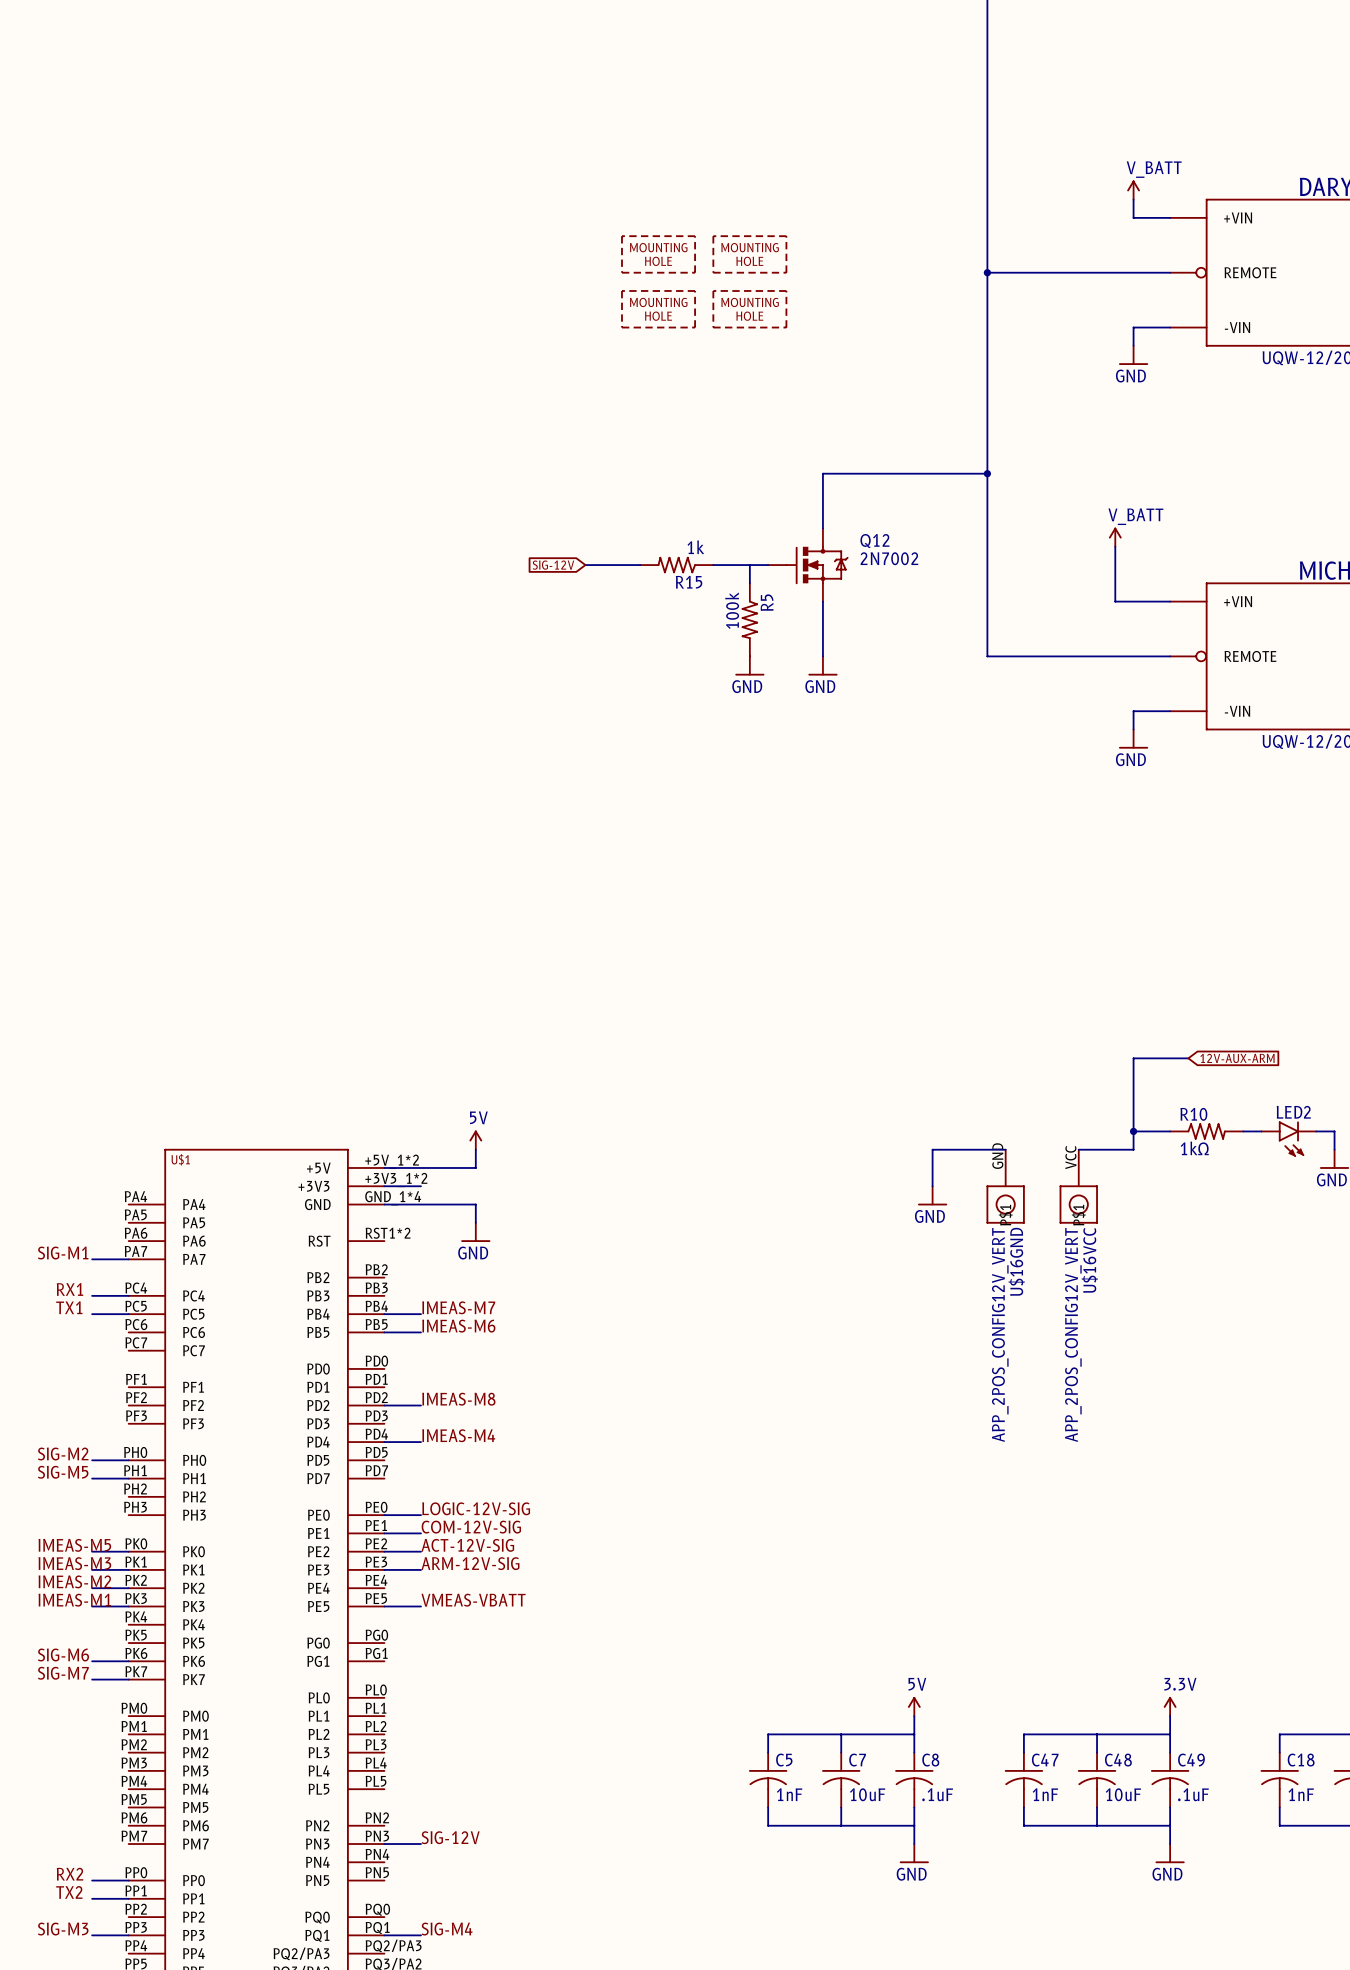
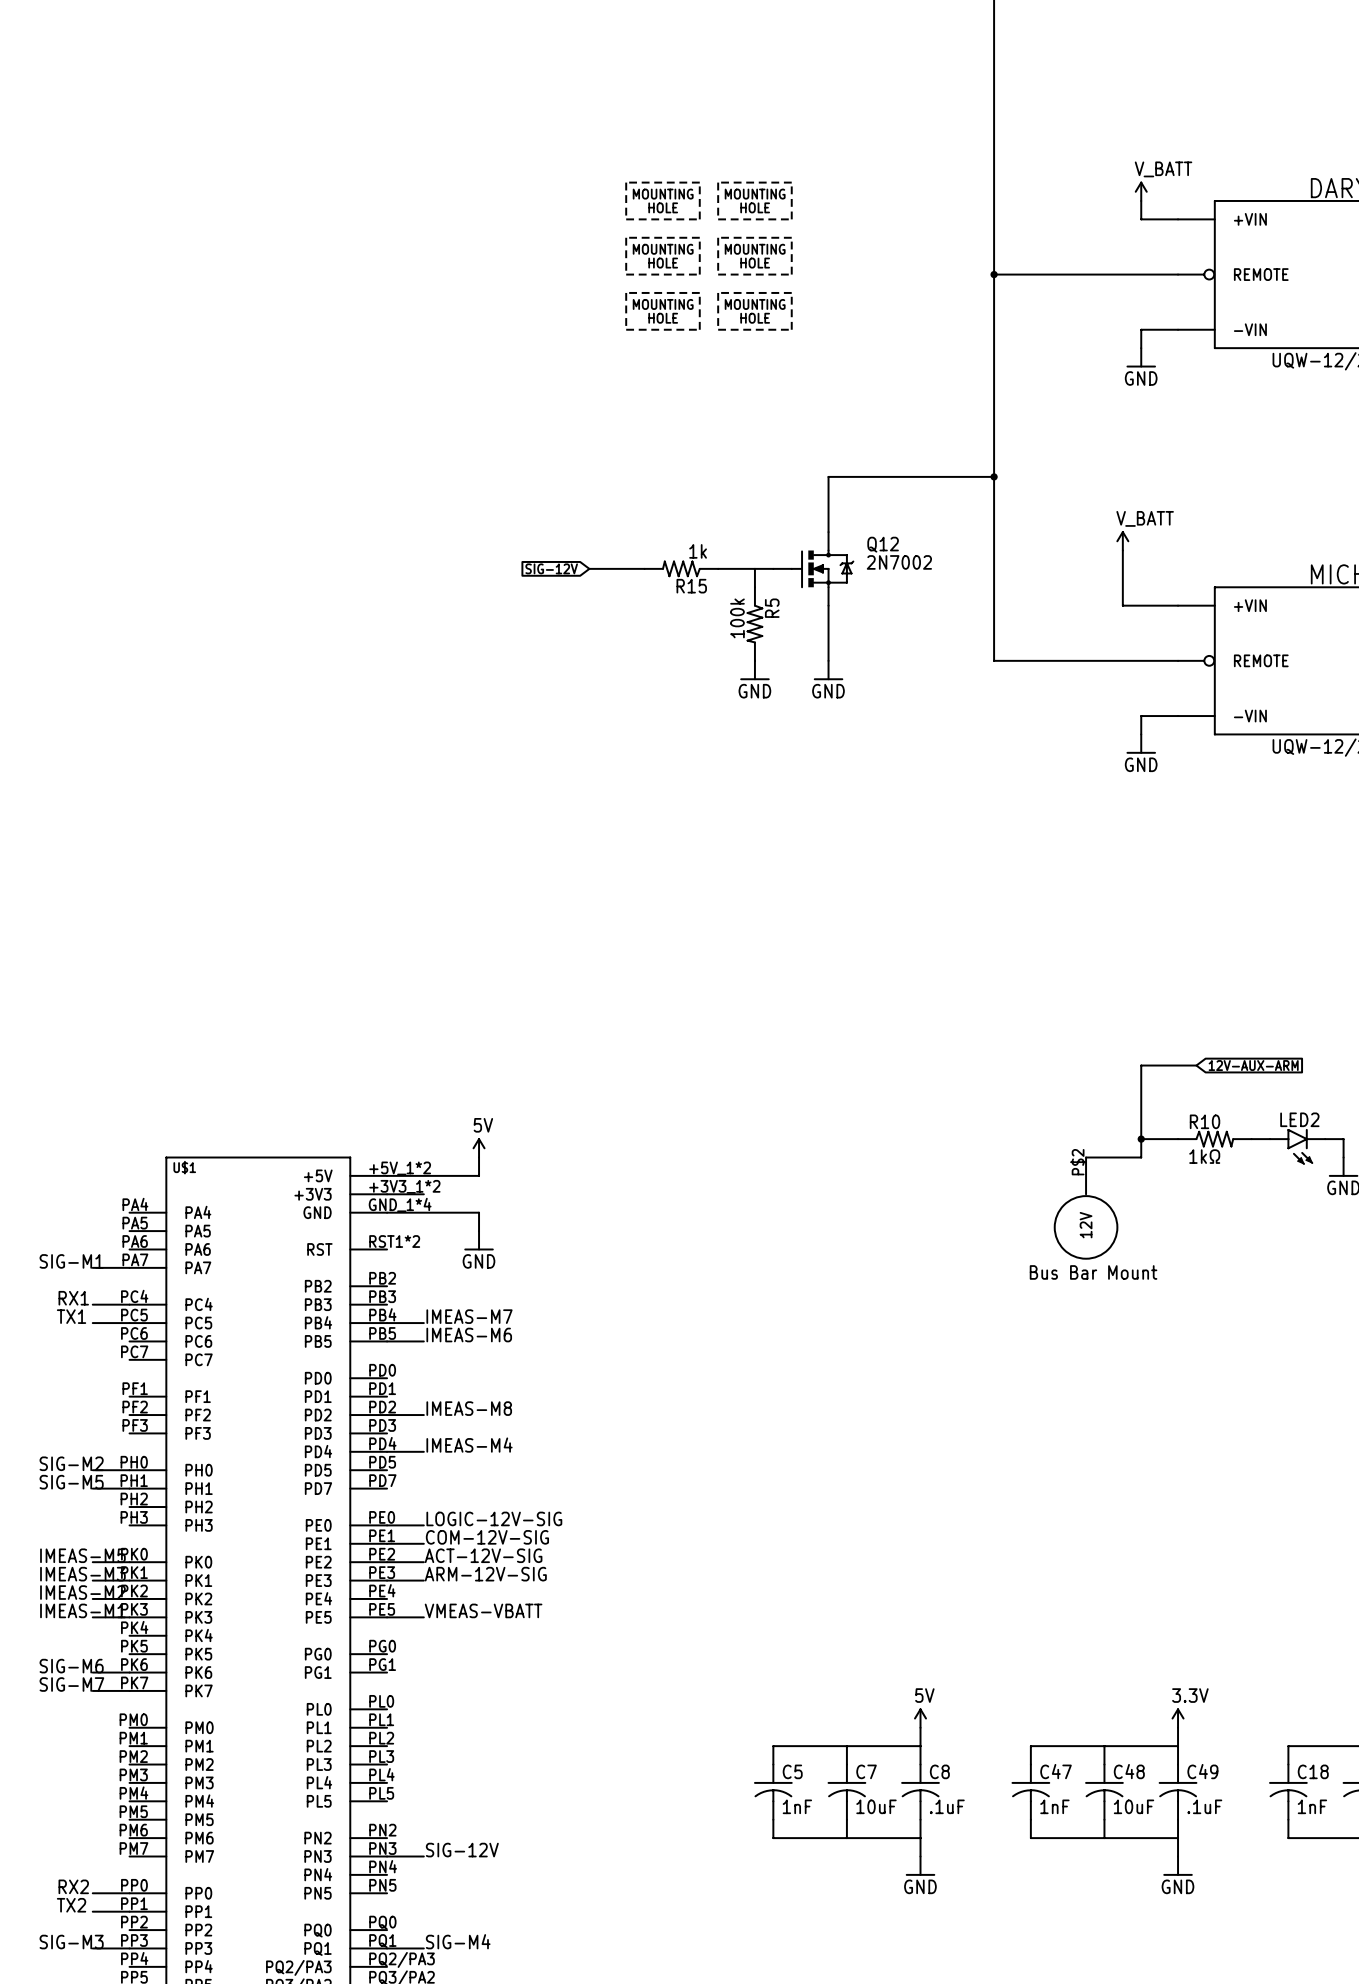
part: none -> (662, 200)
part: none -> (754, 200)
wire: (1005, 1149) (932, 1149) (932, 1186) -> none
U$16GND: APP_2POS_CONFIG12V_VERT (1005, 1186) -> none
U$16VCC: APP_2POS_CONFIG12V_VERT (1078, 1186) -> none
power symbol: GND (932, 1195) -> none
part: none -> (1086, 1208)

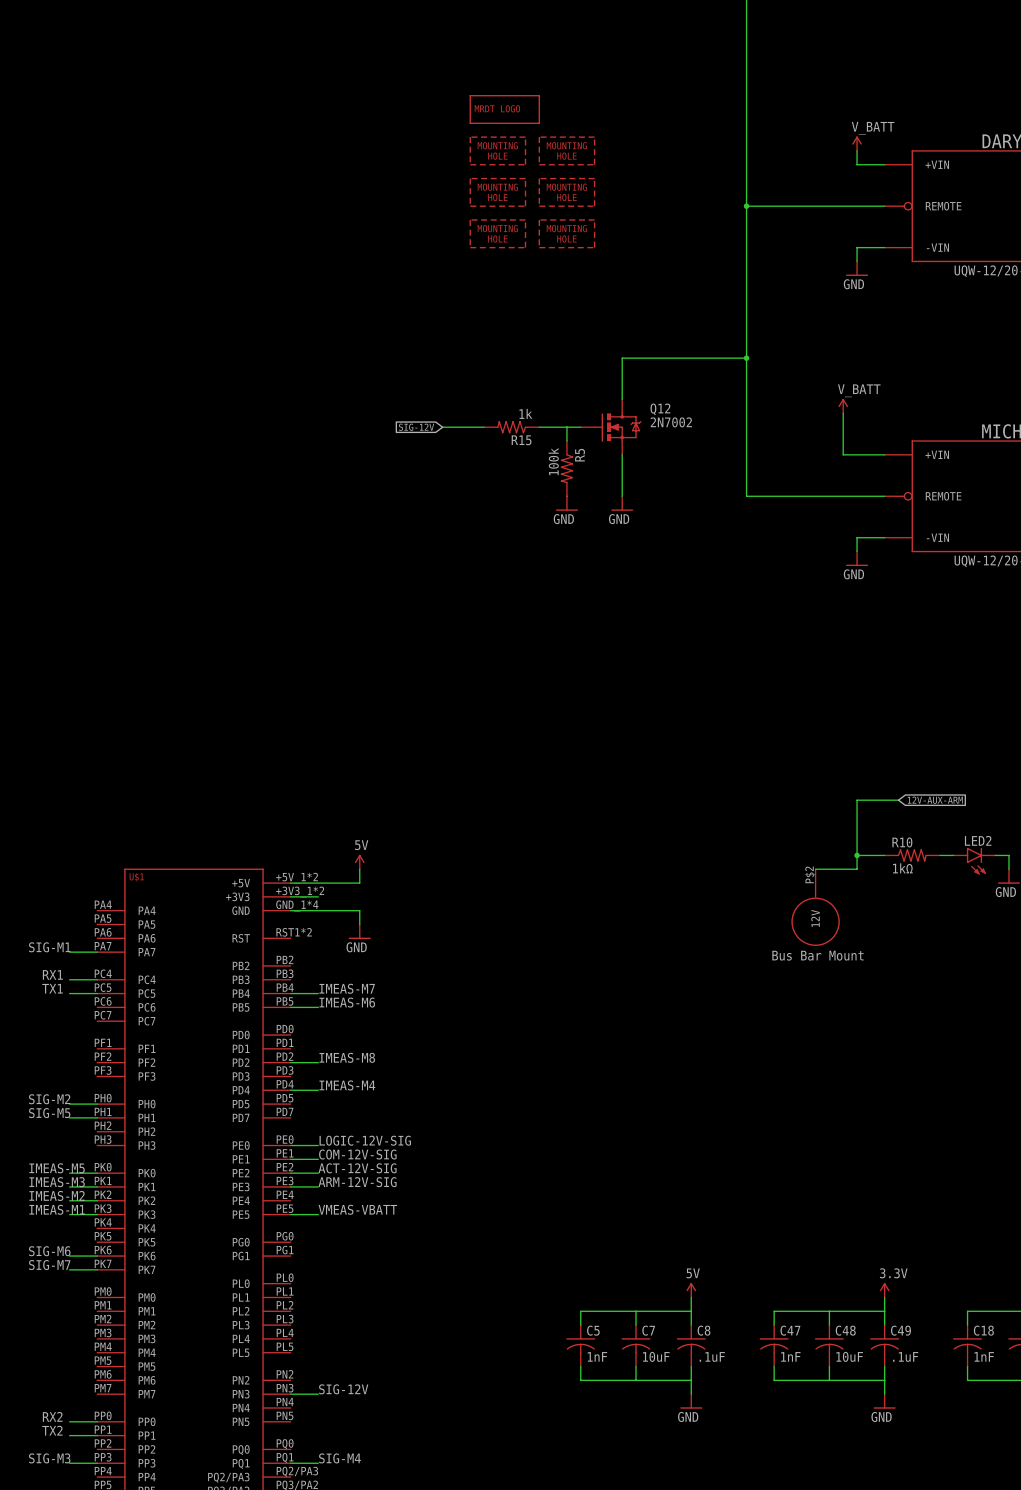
part: none -> (504, 109)

